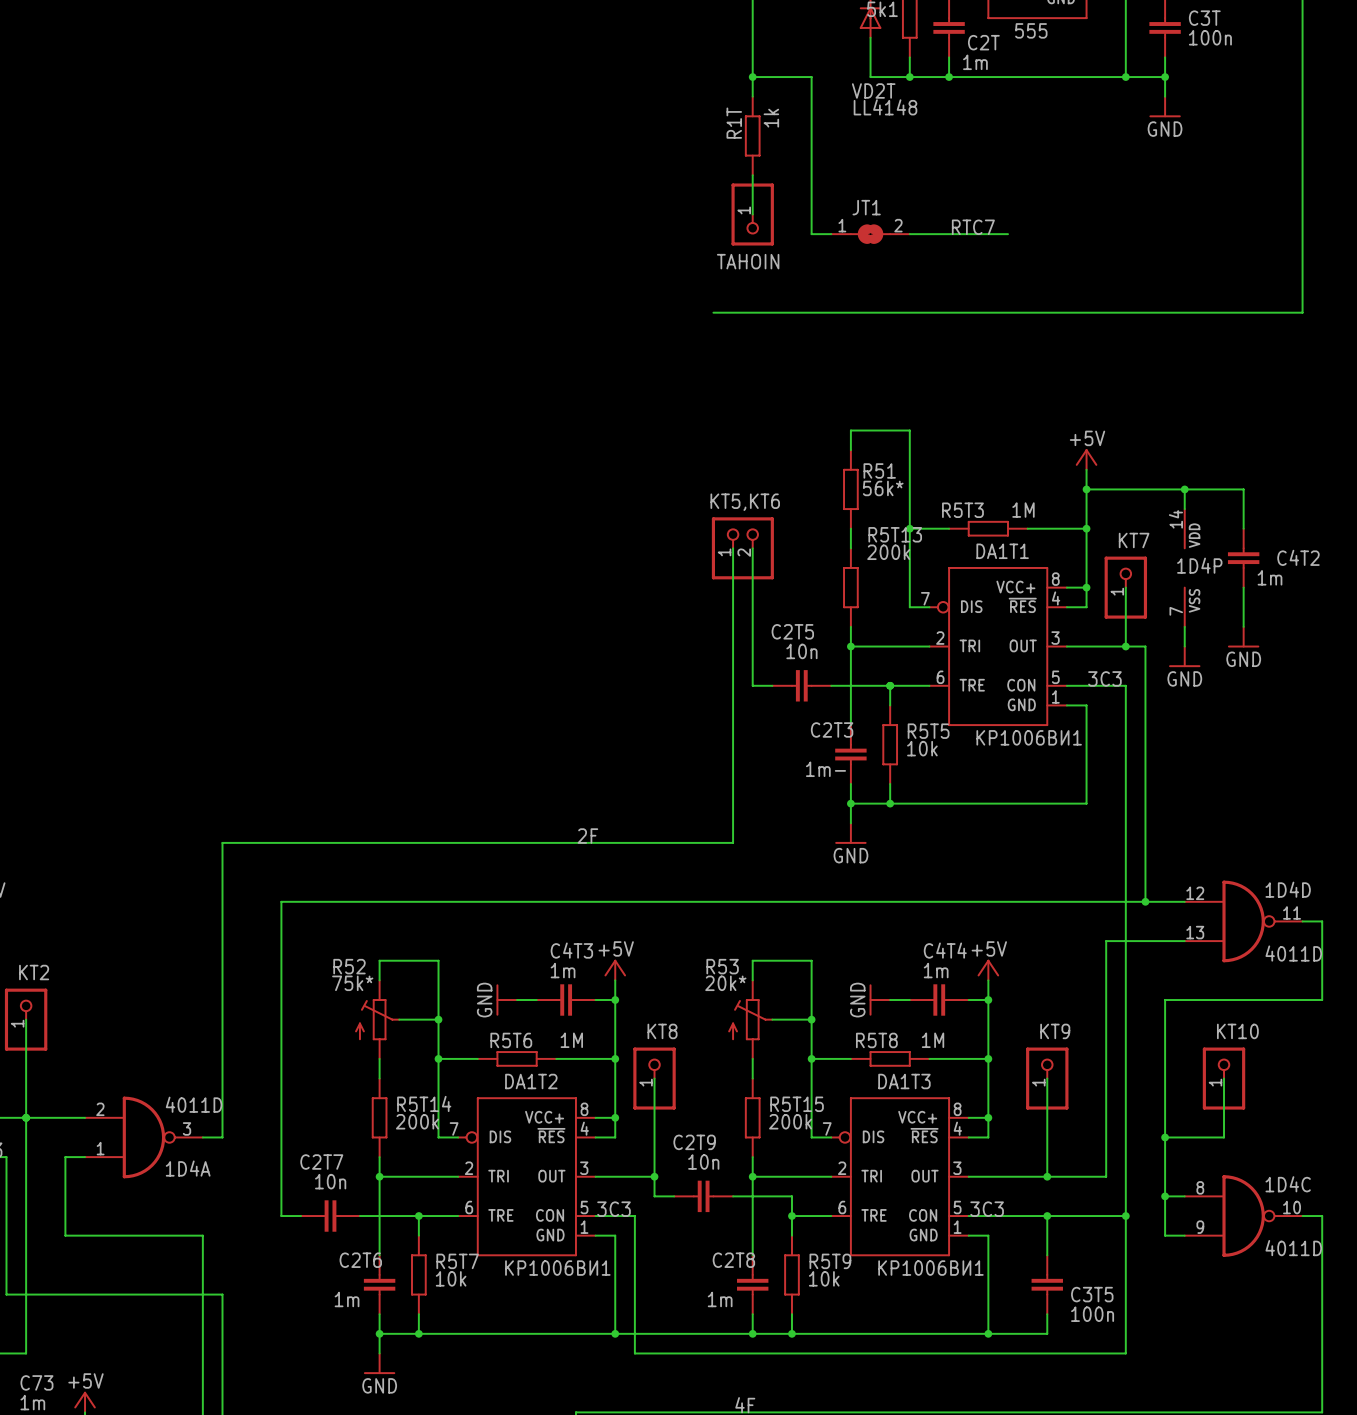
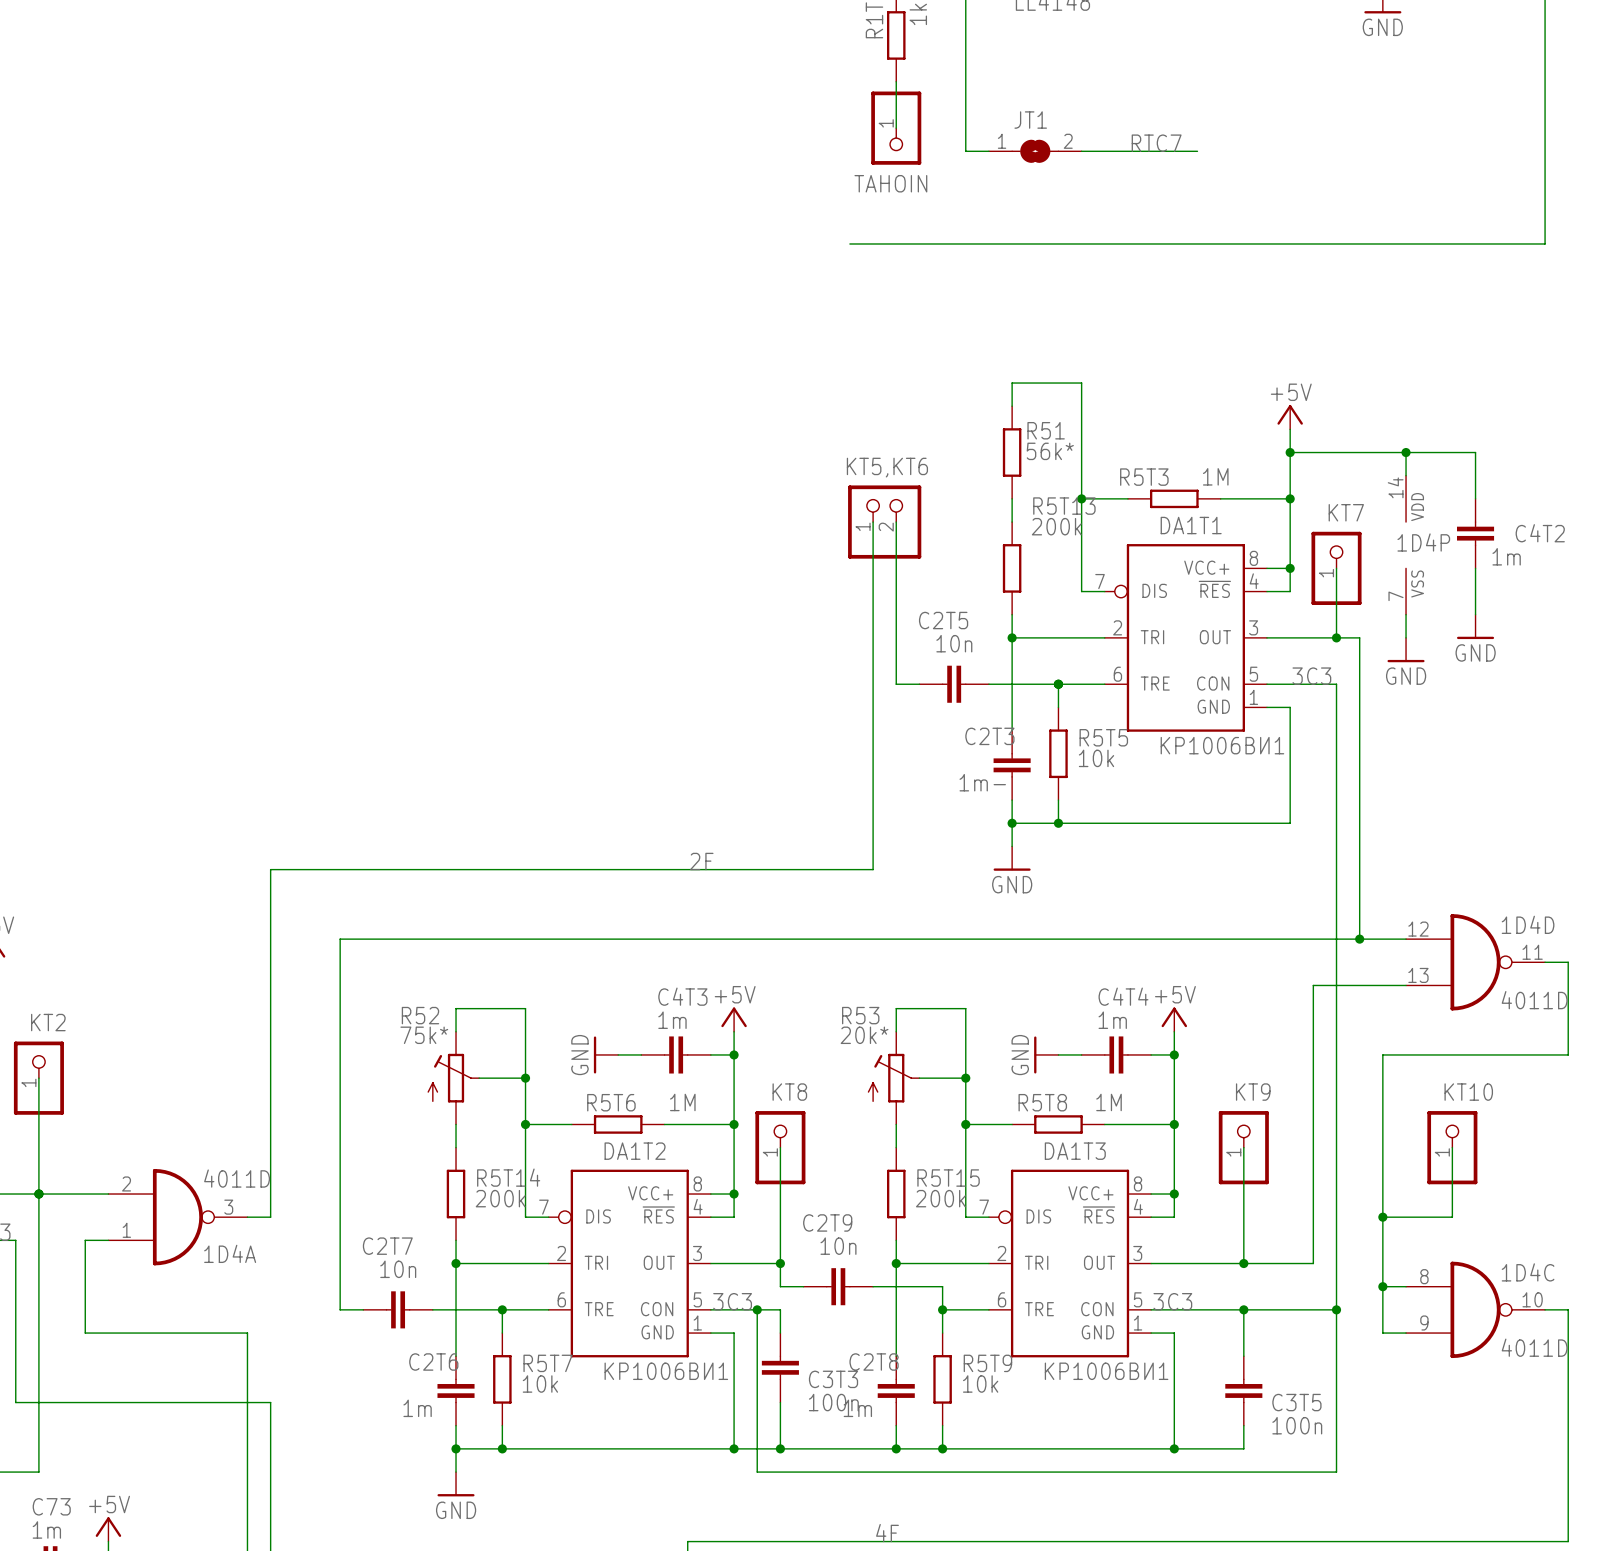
wire: none -> (757, 1309) (780, 1309) (780, 1333)
junction: none -> (757, 1309)
C3T3: none -> 100n (780, 1367)
wire: none -> (780, 1402) (780, 1448)
junction: none -> (780, 1448)

